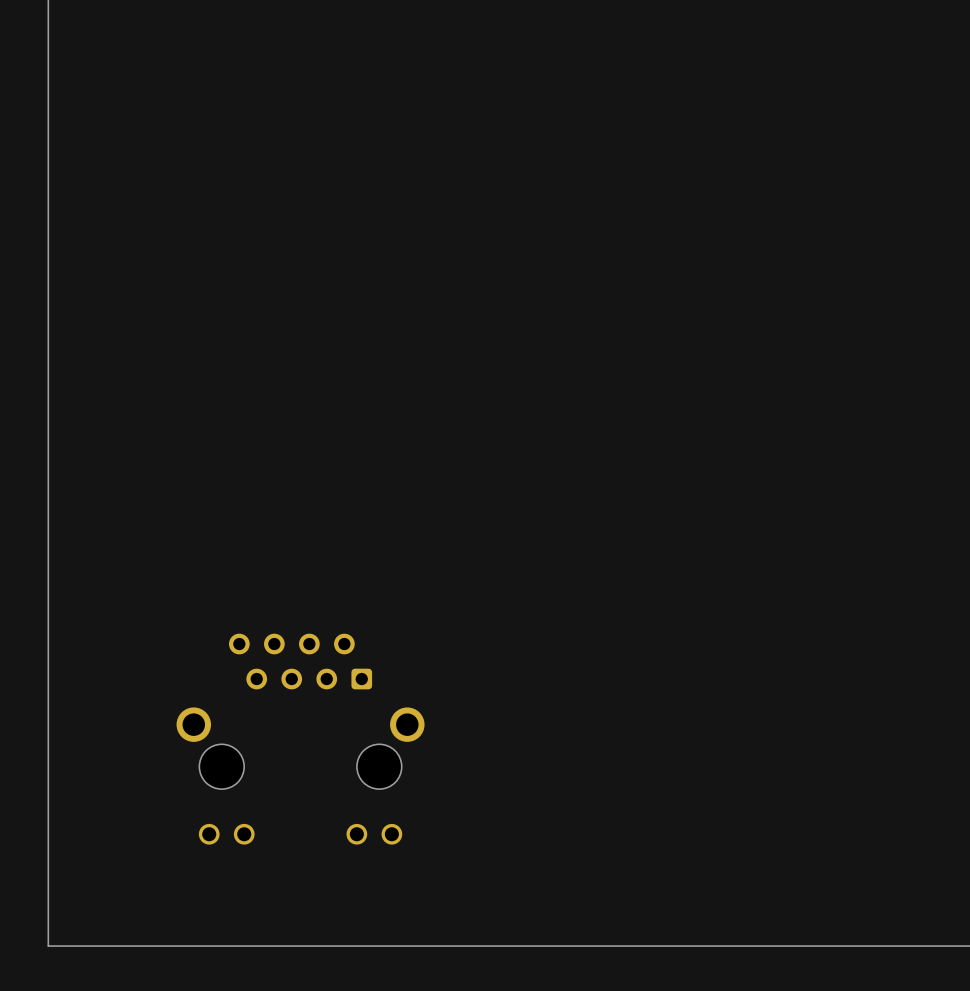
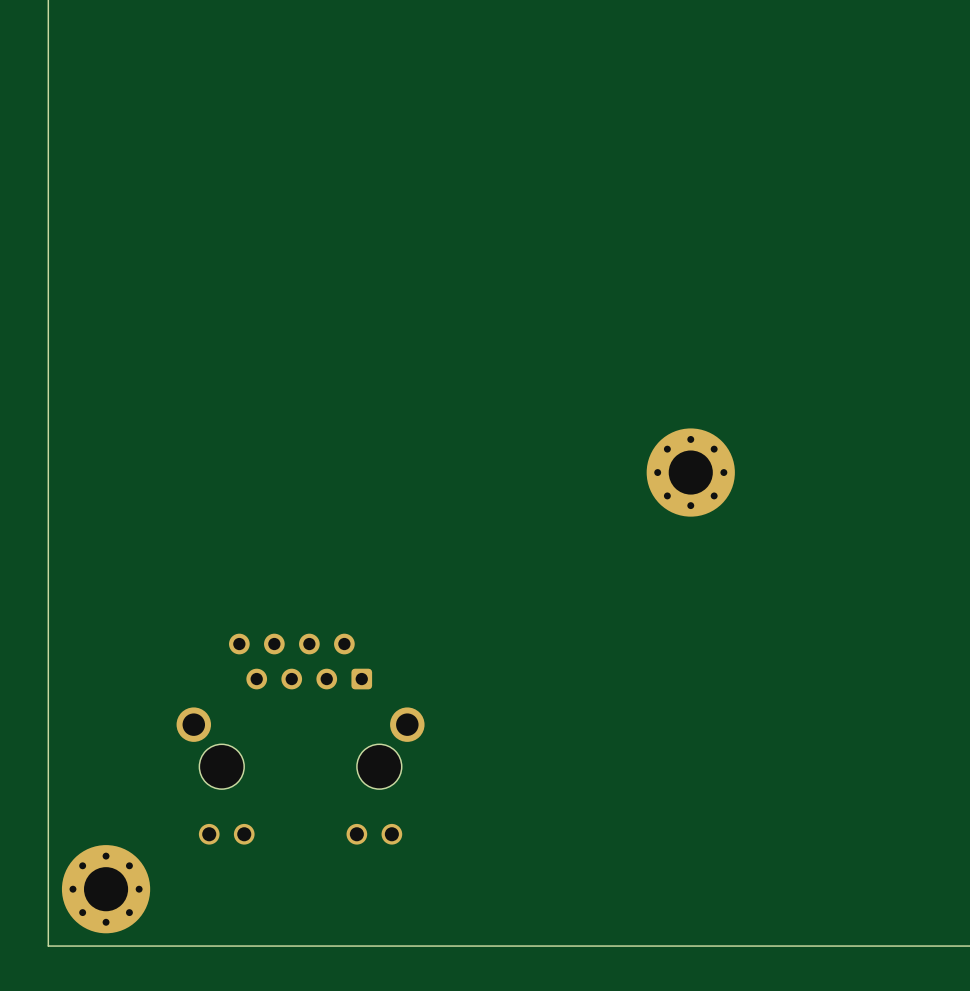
part: none -> (690, 472)
part: none -> (106, 889)

